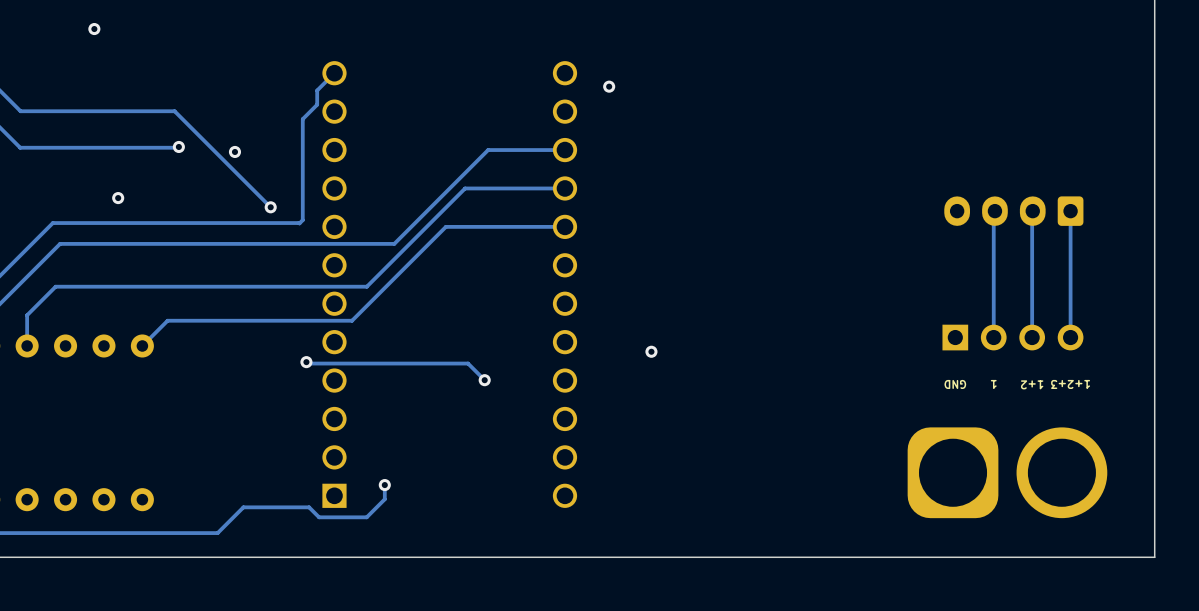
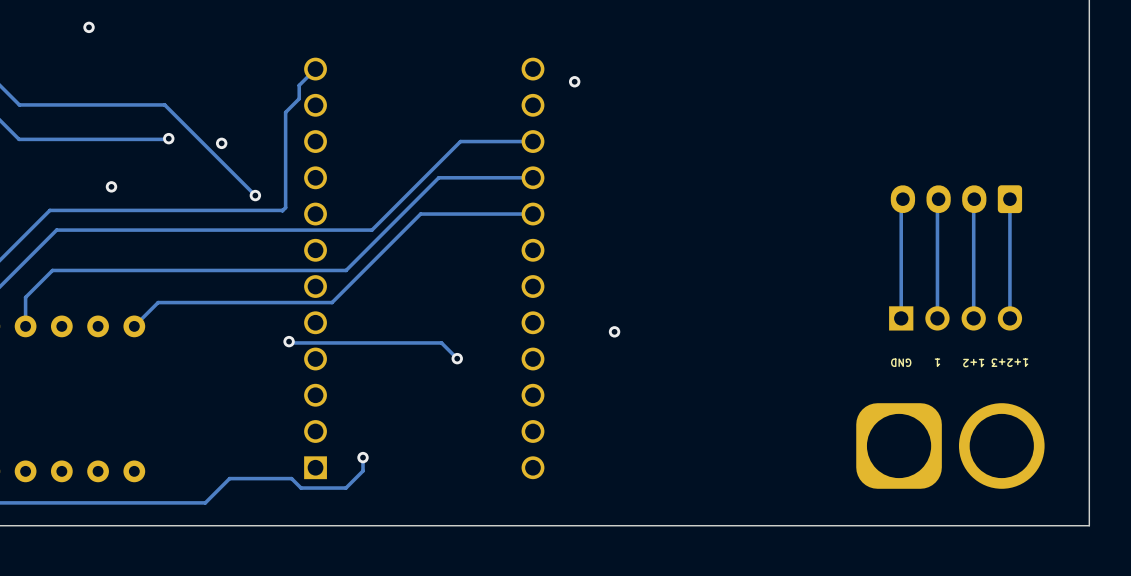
track: none -> (901, 200) (901, 318)

